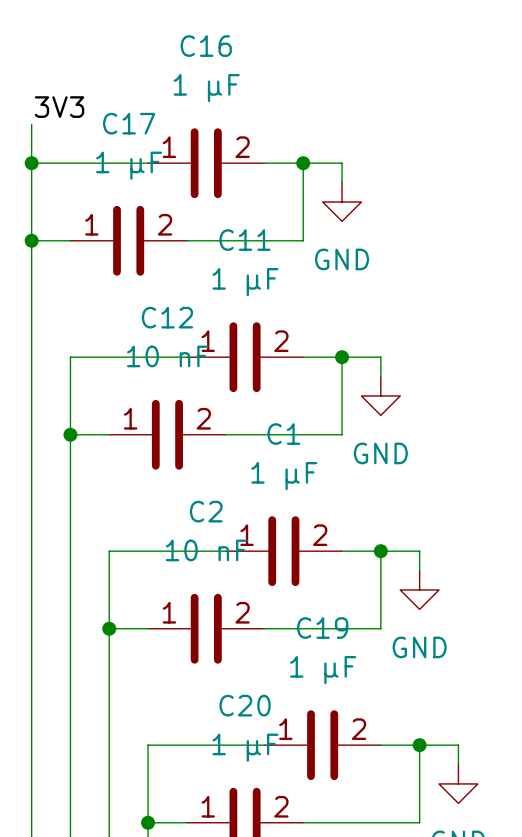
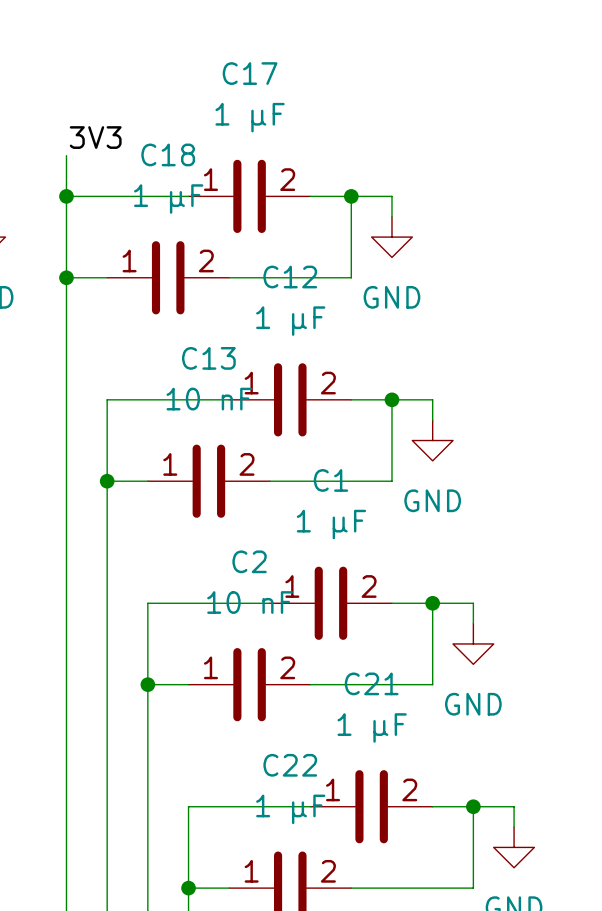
C16 name: C16 (206, 46) -> C17 (250, 73)
C17 name: C17 (129, 123) -> C18 (168, 154)
C11 name: C11 (245, 240) -> C12 (290, 277)
C12 name: C12 (167, 317) -> C13 (208, 358)
C19 name: C19 (322, 628) -> C21 (371, 683)
C20 name: C20 (245, 705) -> C22 (290, 765)

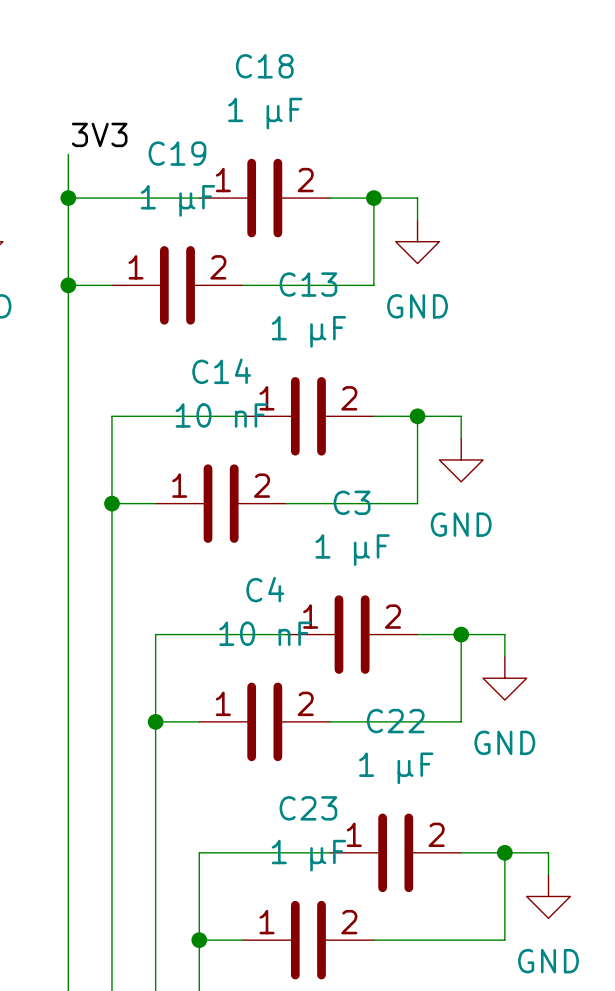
C17 name: C17 (250, 73) -> C18 (264, 66)
C18 name: C18 (168, 154) -> C19 (177, 153)
C12 name: C12 (290, 277) -> C13 (308, 284)
C13 name: C13 (208, 358) -> C14 (221, 371)
C1 name: C1 (330, 480) -> C3 (352, 502)
C2 name: C2 (249, 561) -> C4 (265, 589)
C21 name: C21 (371, 683) -> C22 (395, 721)
C22 name: C22 (290, 765) -> C23 (308, 808)

